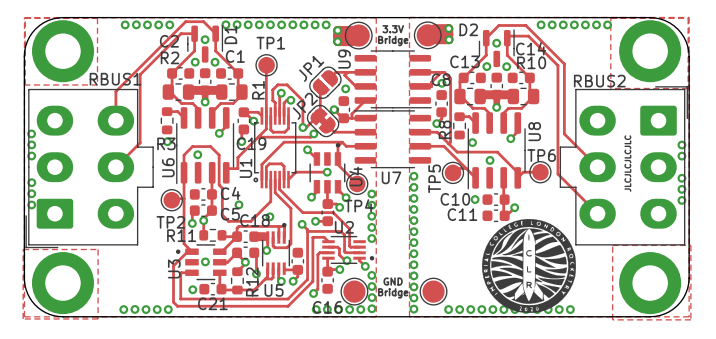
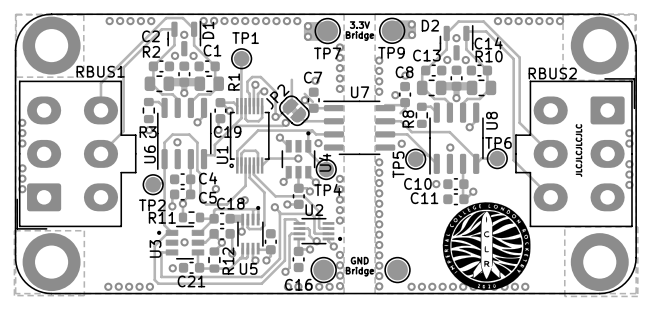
via: none -> (339, 47)
TP9 name: none -> TP9 (391, 52)
TP7 name: none -> TP7 (327, 53)
via: none -> (339, 57)
via: none -> (379, 60)
track: (347, 72) (344, 75) (355, 86) (365, 86) -> none
track: (365, 72) (335, 72) (330, 77) -> none
track: (420, 72) (444, 72) (450, 78) (450, 142) (448, 143) (457, 152) (497, 152) (517, 172) (517, 177) -> none
track: (441, 72) (431, 82) (431, 86) (420, 86) -> none
via: none -> (339, 68)
via: none -> (379, 70)
U9: (393, 79) -> none
JP1: (325, 82) -> none
C7 name: none -> C7 (313, 77)
via: none -> (339, 78)
via: none -> (379, 81)
via: none -> (339, 88)
track: (365, 100) (351, 113) (351, 118) -> none
via: none -> (379, 91)
track: none -> (304, 93) (312, 102)
via: none -> (395, 95)
track: none -> (385, 105) (402, 105)
via: (436, 123) -> none
via: (472, 142) -> none
track: none -> (411, 132) (449, 132) (476, 158)
via: none -> (318, 143)
via: none -> (401, 143)
U7 name position: U7 (391, 177) -> U7 (360, 92)

